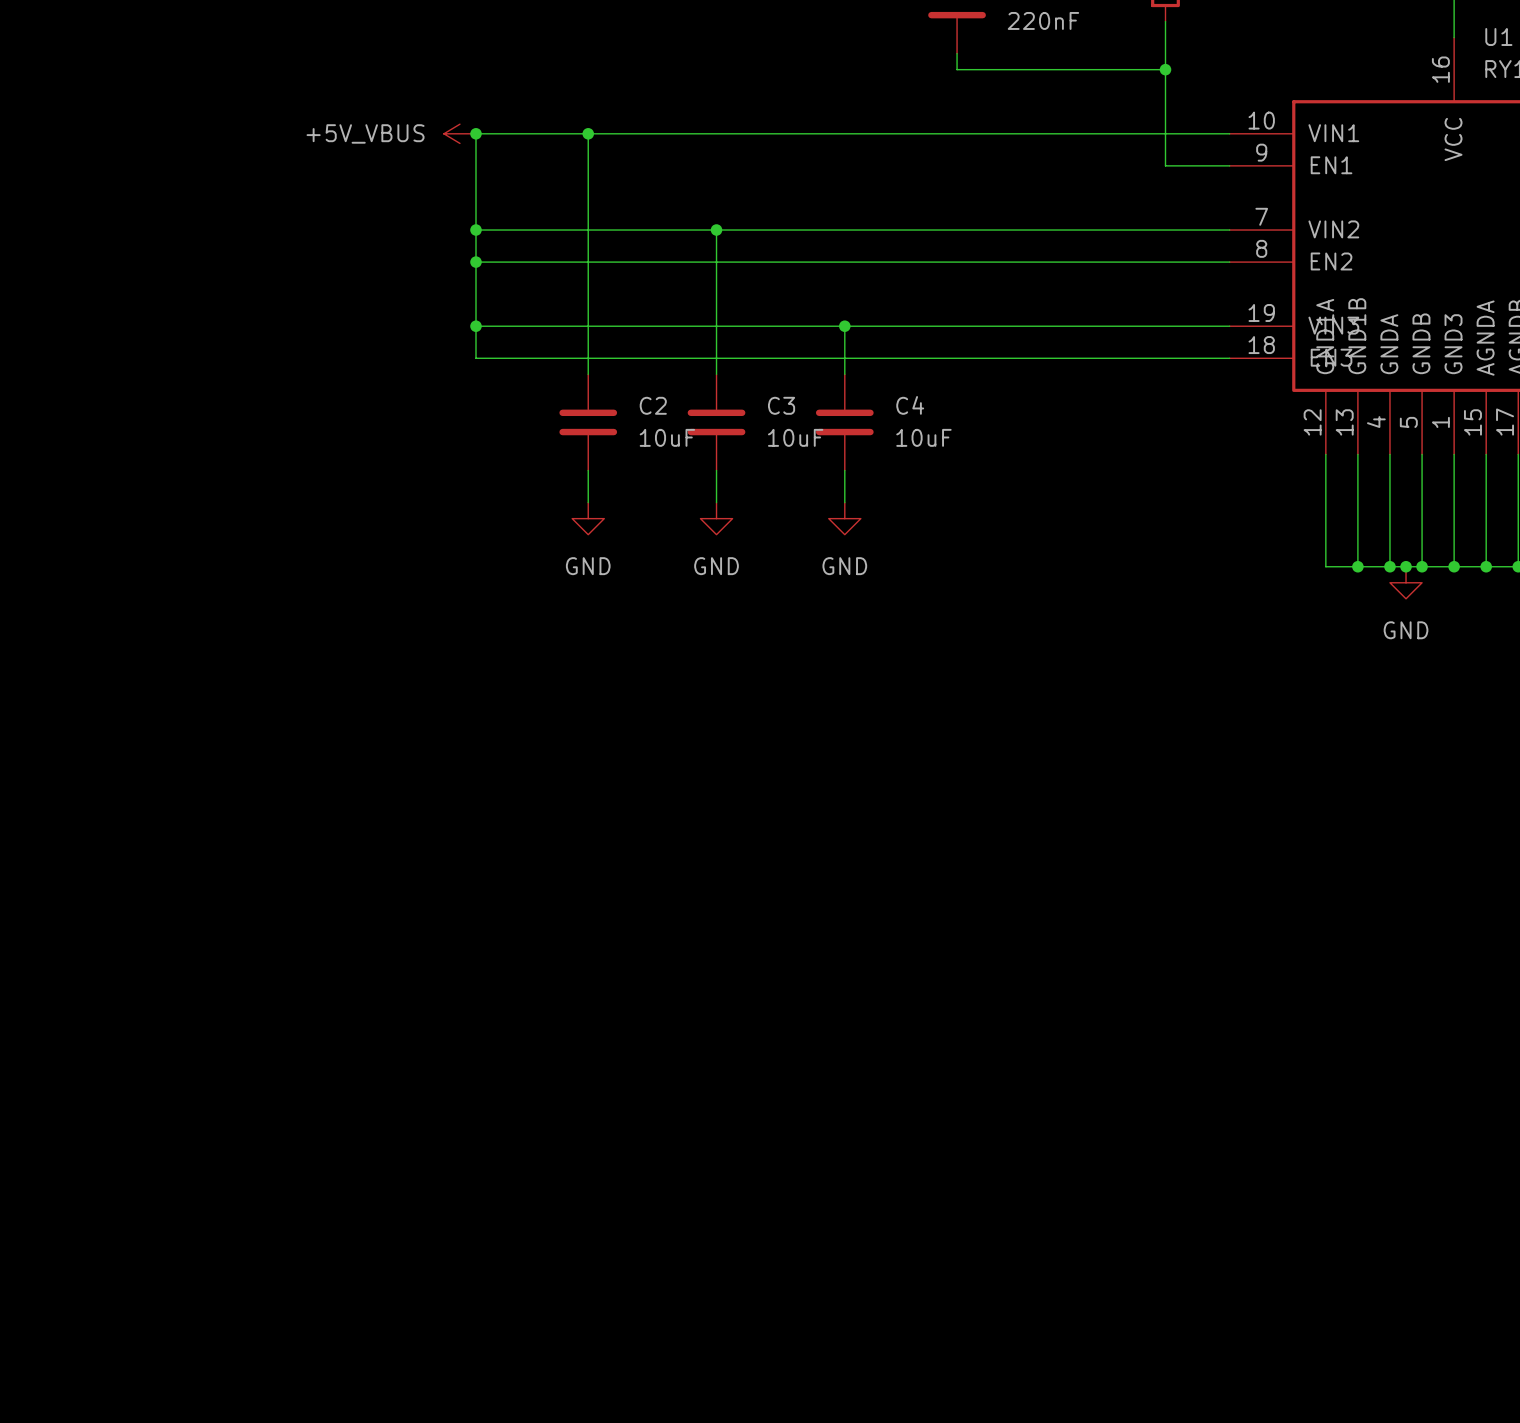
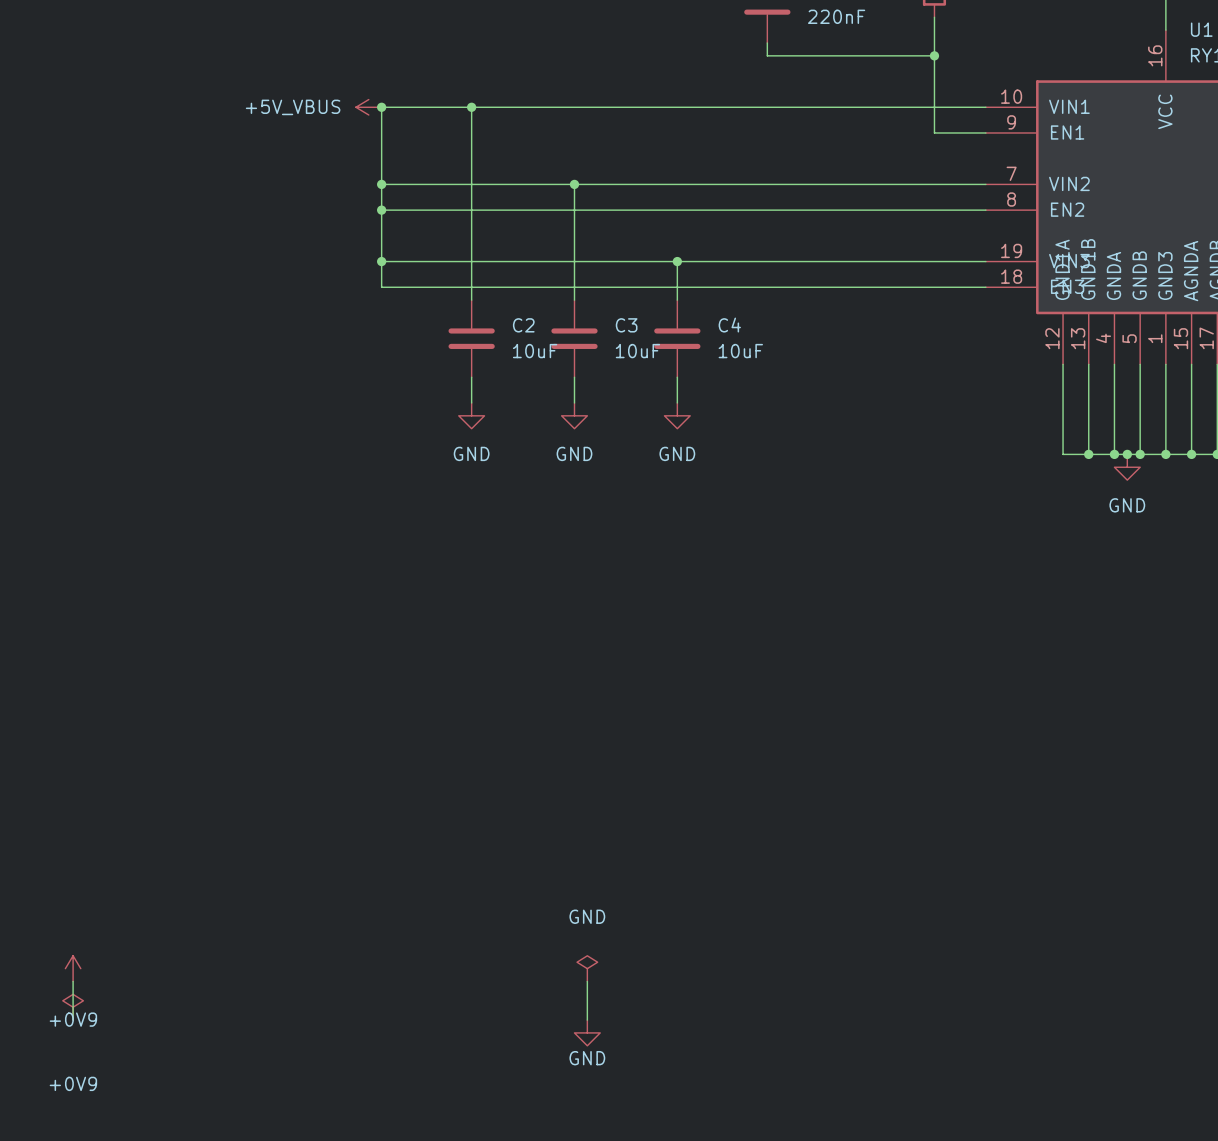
power symbol: none -> +0V9 (73, 968)
power symbol: none -> GND (587, 968)
wire: none -> (73, 981) (73, 1020)
wire: none -> (587, 981) (587, 1020)
power symbol: none -> +0V9 (73, 1007)
power symbol: none -> GND (587, 1032)

